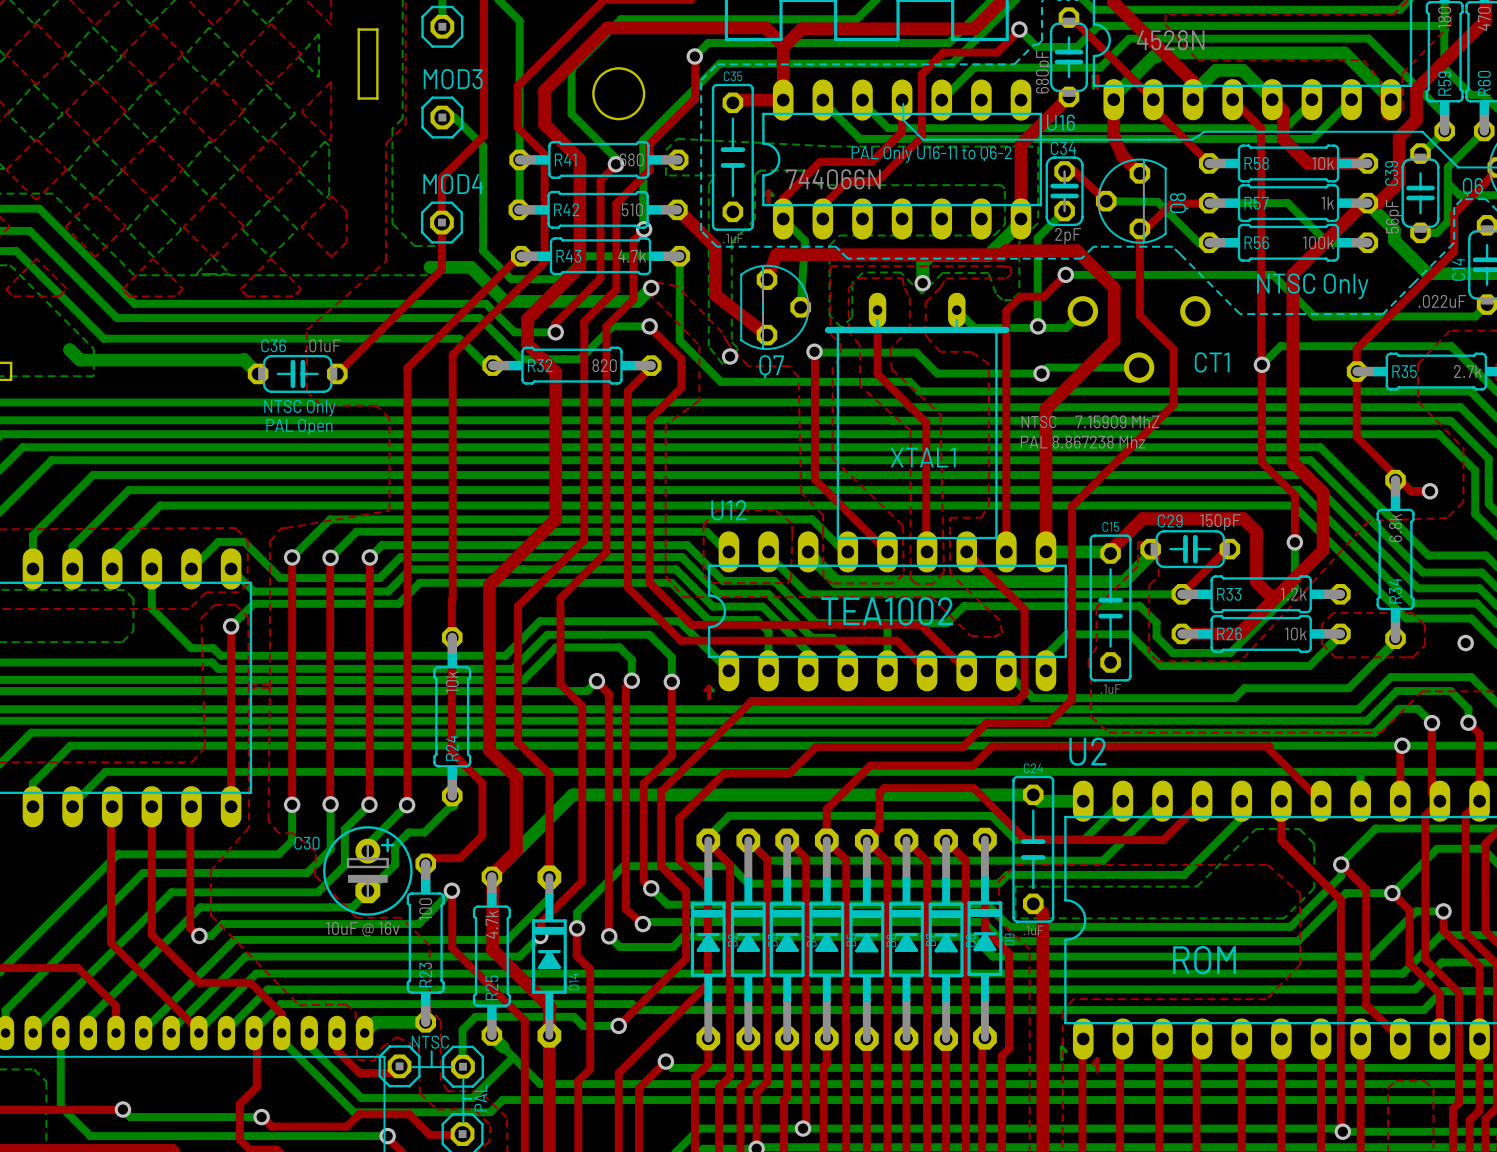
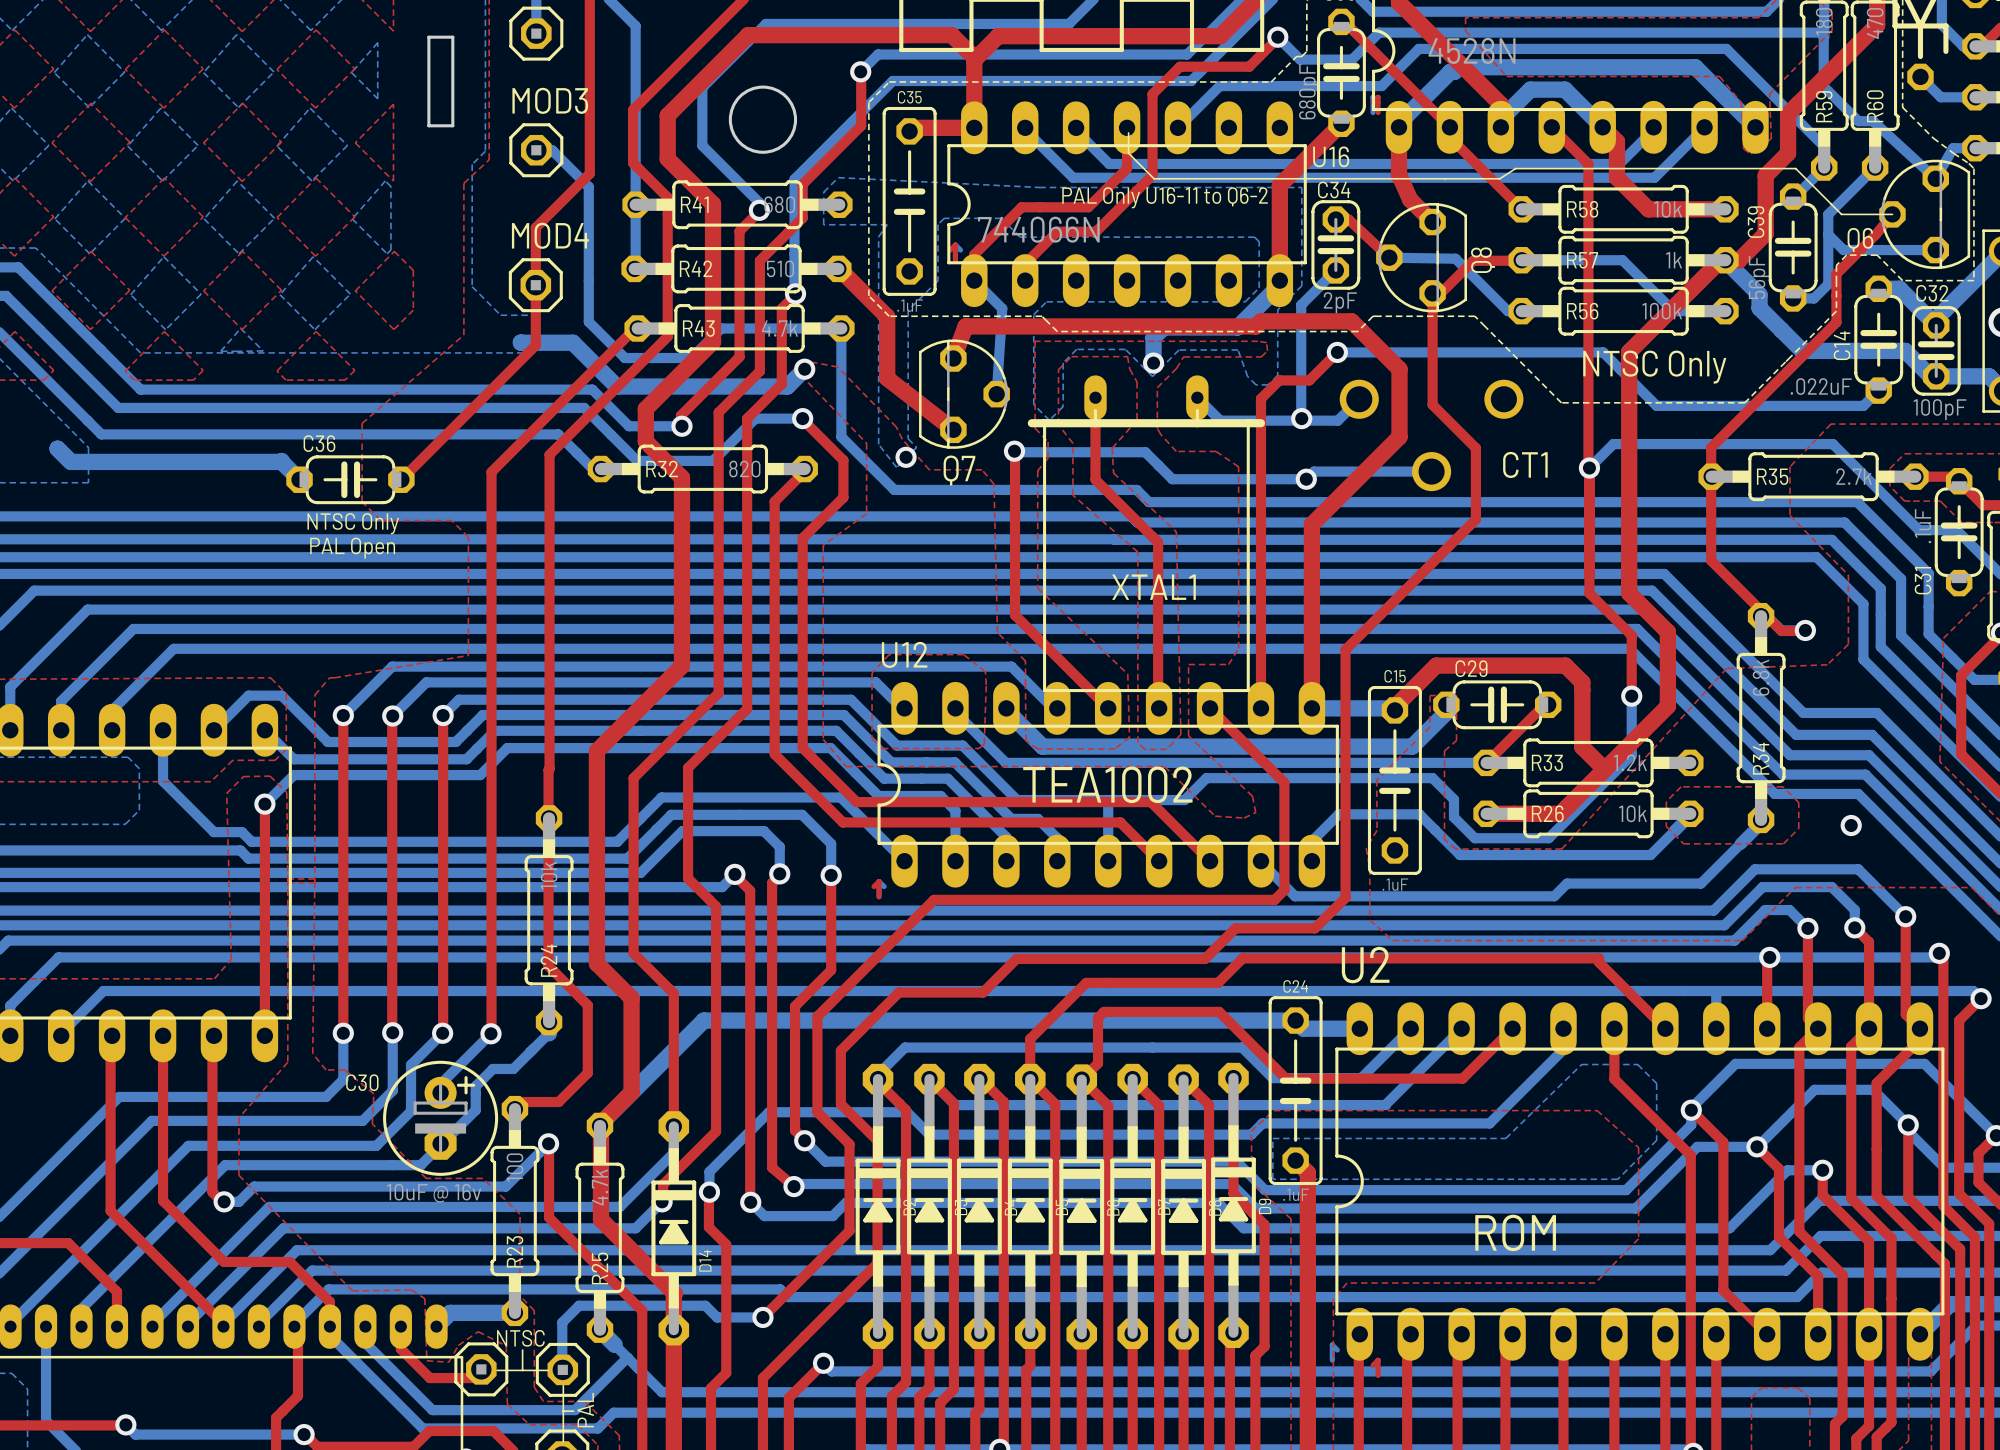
C36 value: .01uF (322, 345) -> none
text: NTSC (1039, 421) -> none
XTAL1 value: 7.15909 MhZ (1117, 421) -> none
text: PAL 8.867238 Mhz (1082, 442) -> none
C29 value: 150pF (1220, 522) -> none

